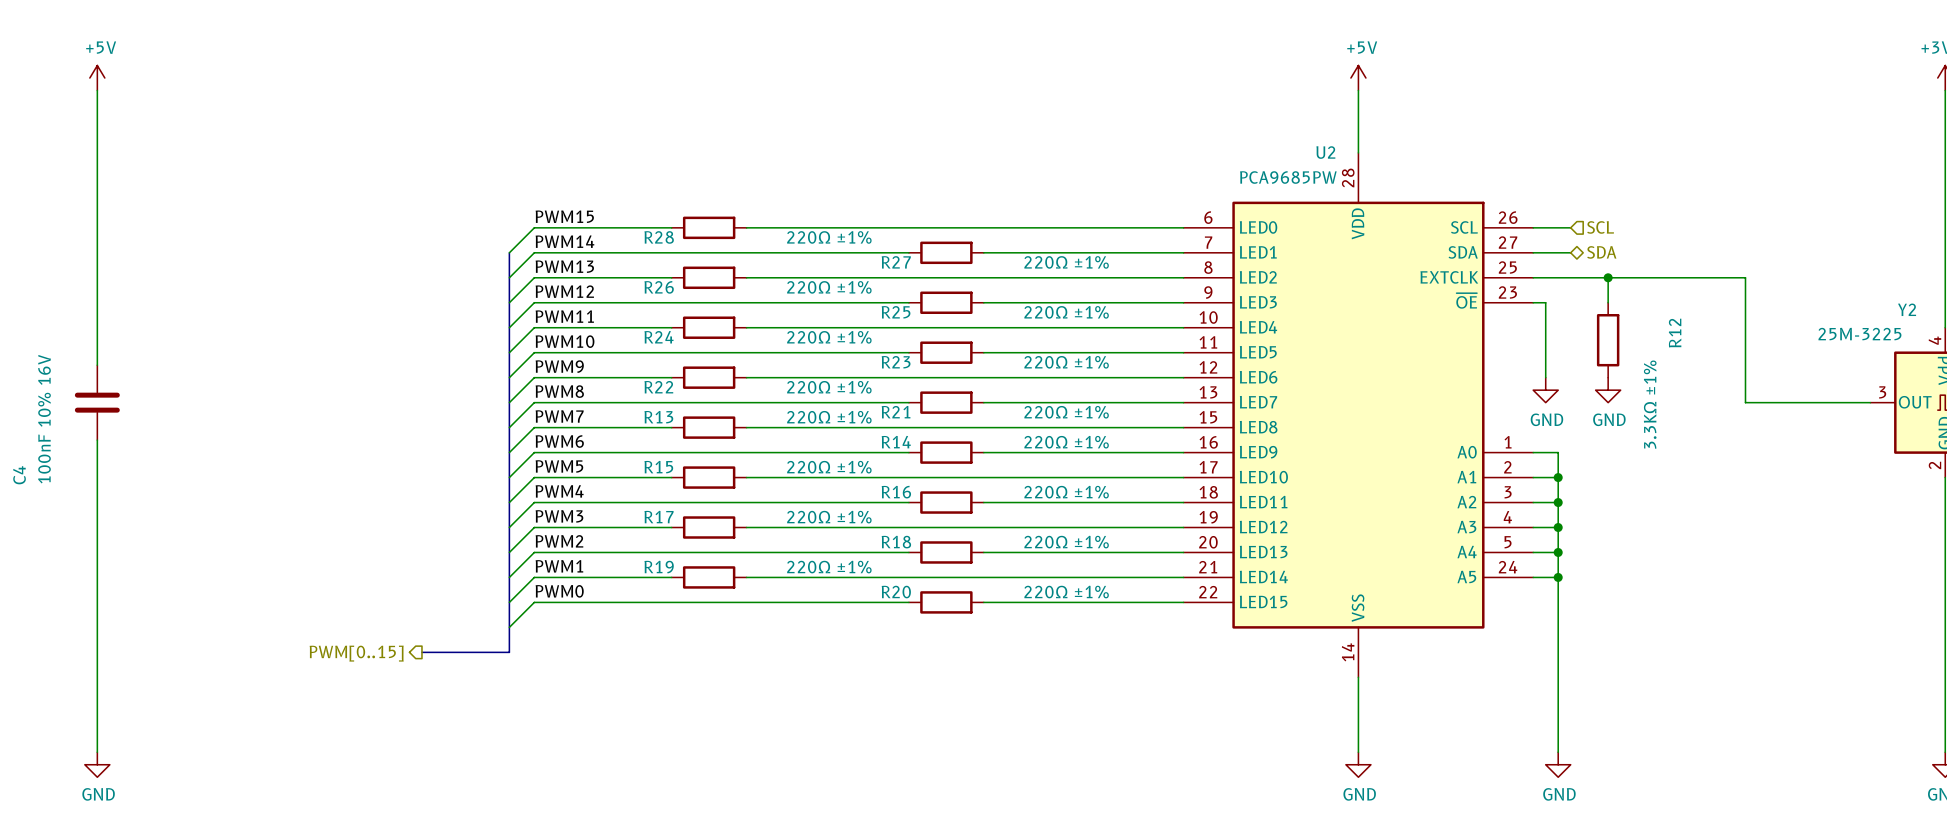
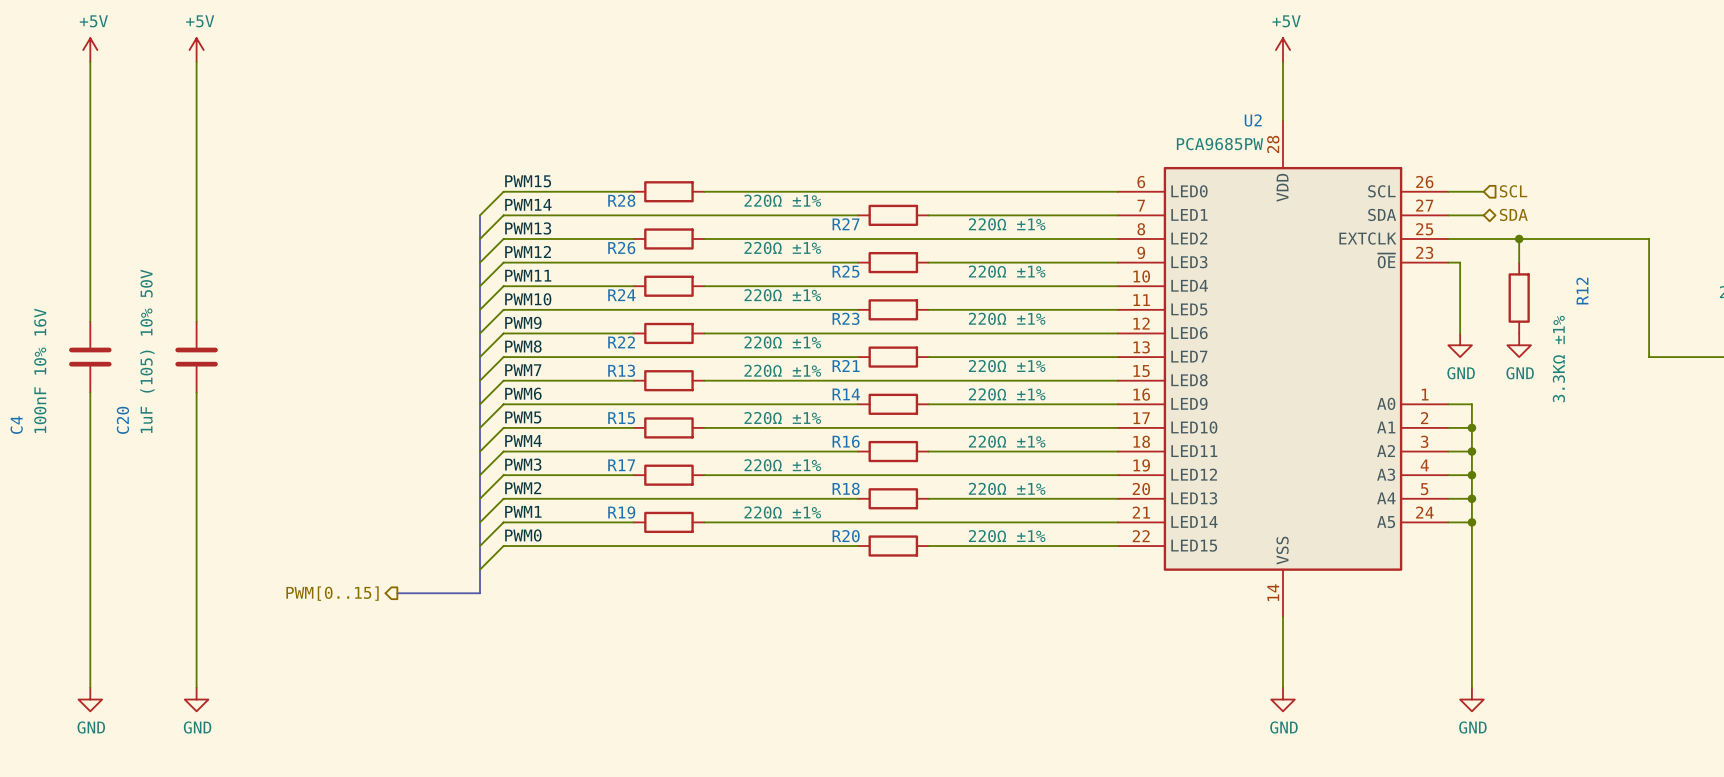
power symbol: none -> +5V (196, 50)
wire: none -> (196, 61) (196, 321)
C20: none -> 1uF (105) 10% 50V (196, 357)
wire: none -> (196, 392) (196, 687)
power symbol: none -> GND (196, 699)

